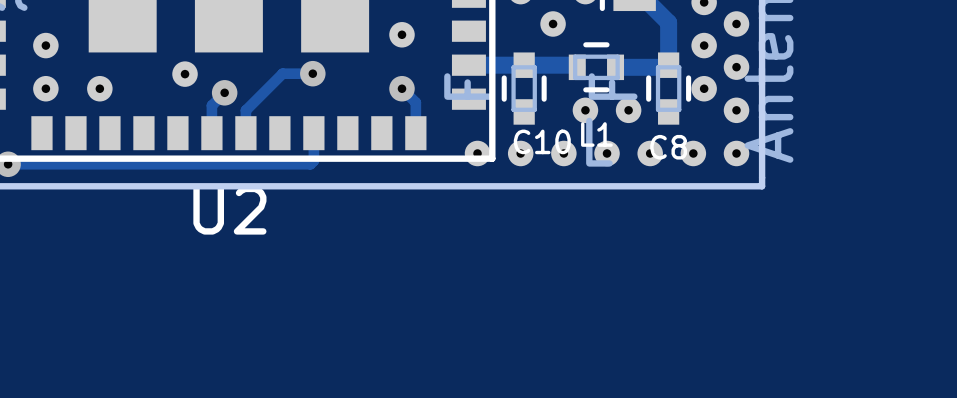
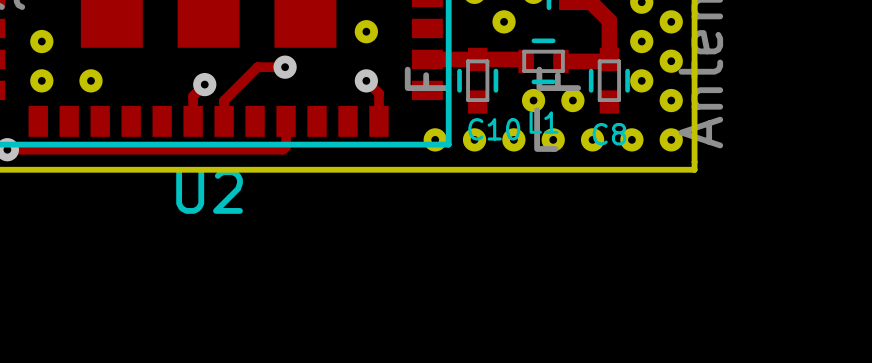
part: (185, 74) -> none

